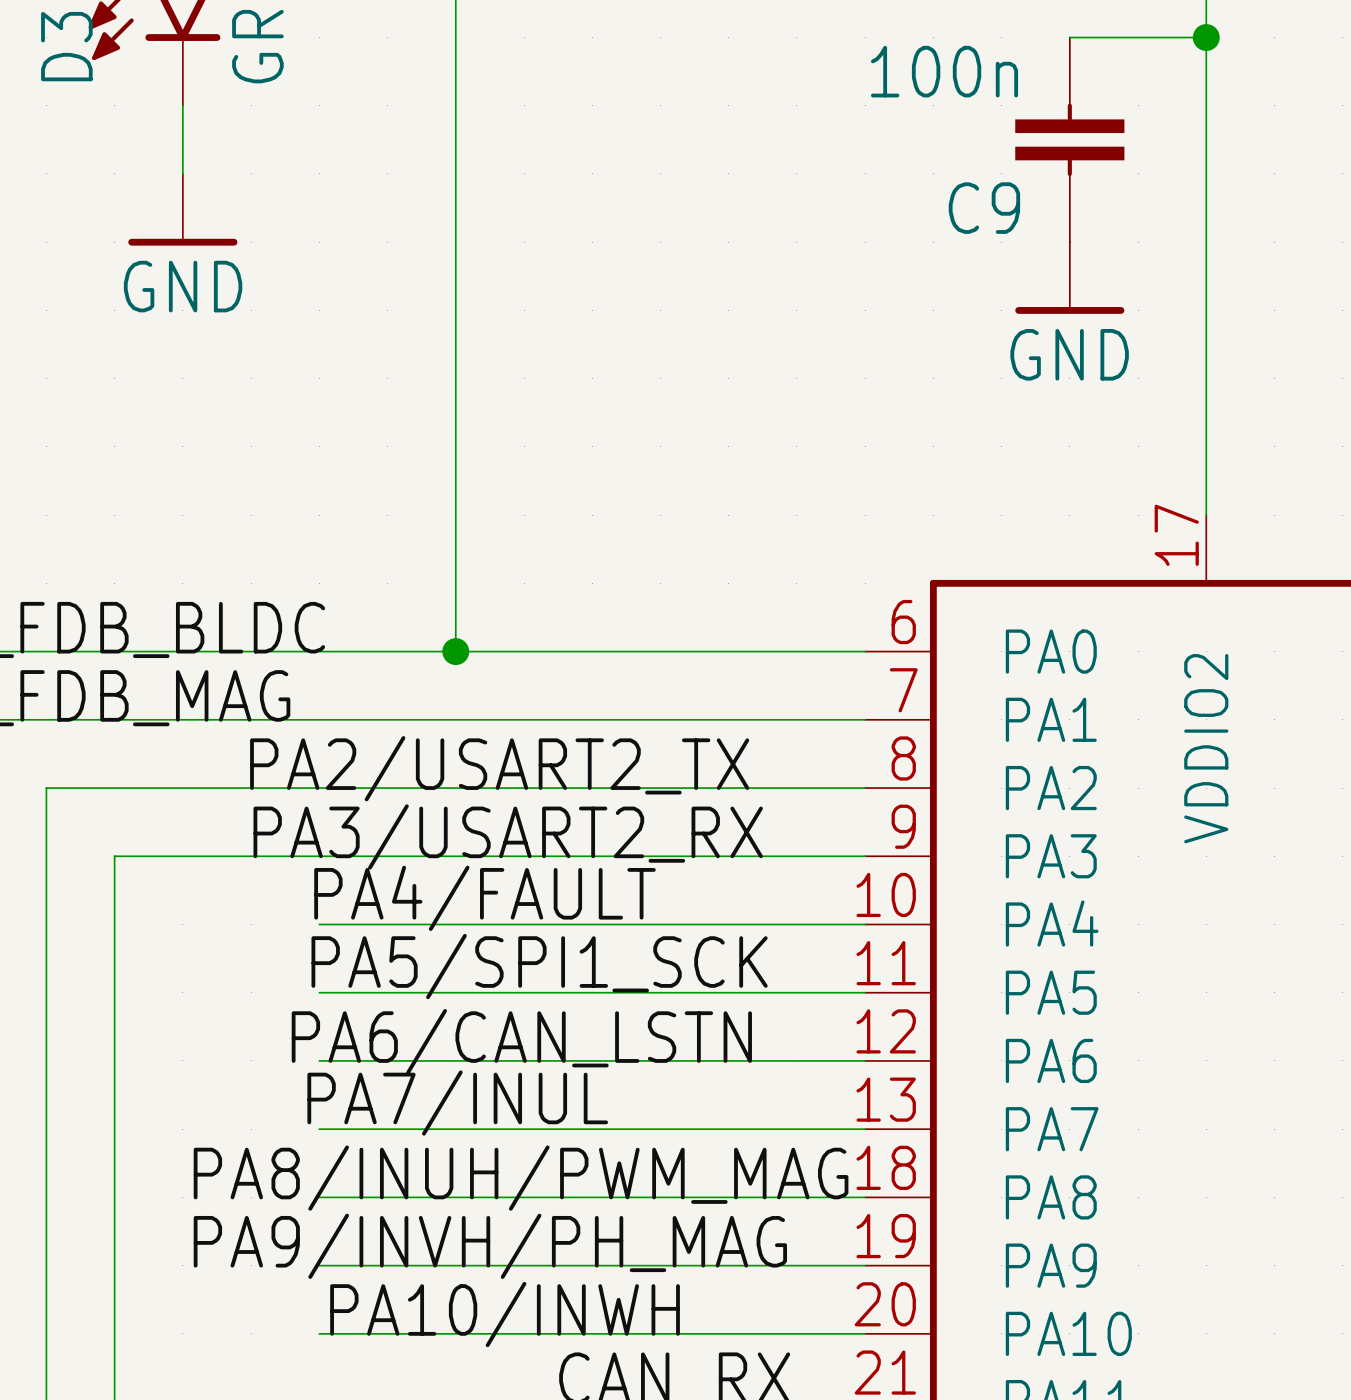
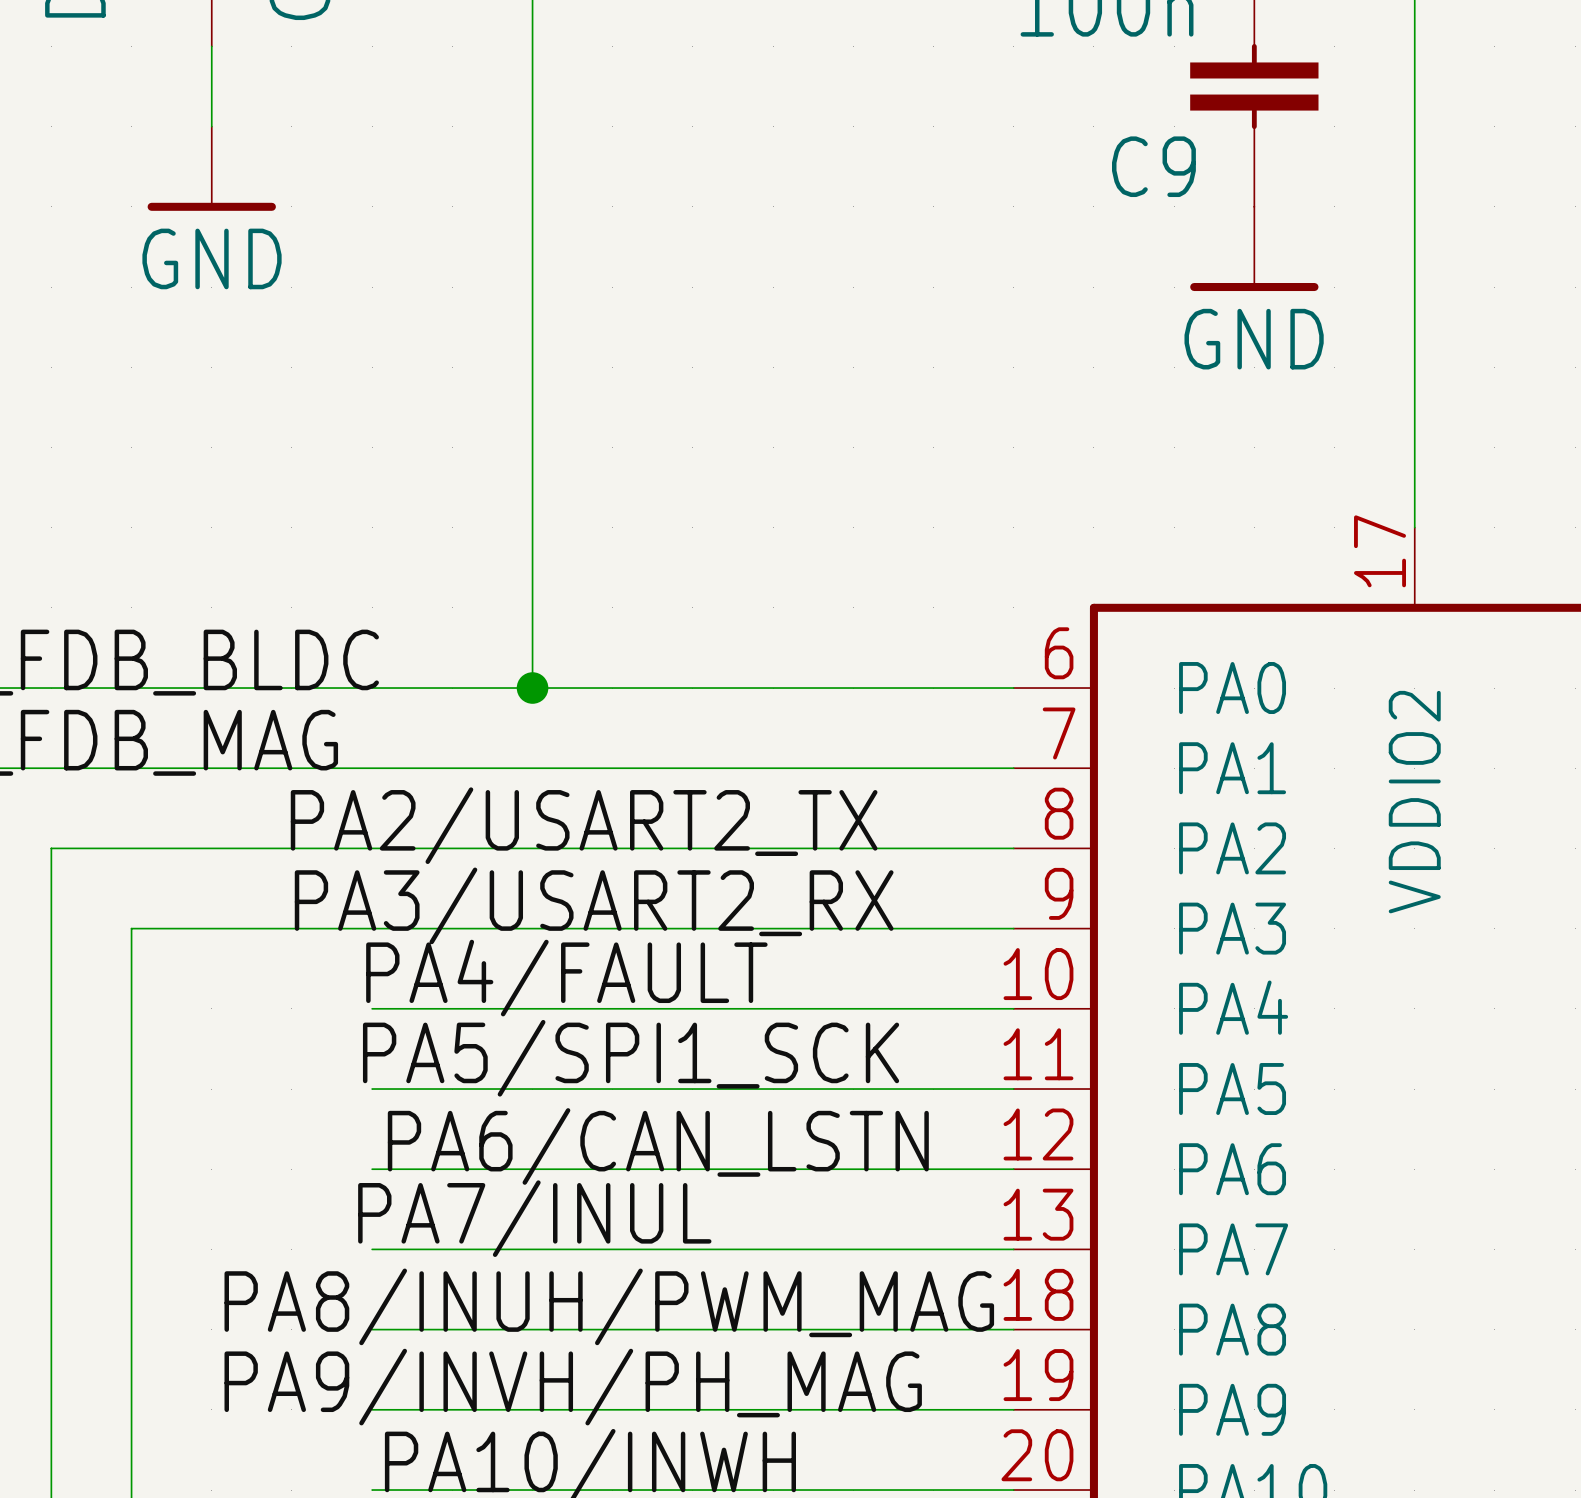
label position: PA6/CAN_LSTN (521, 1041) -> PA6/CAN_LSTN (658, 1146)

